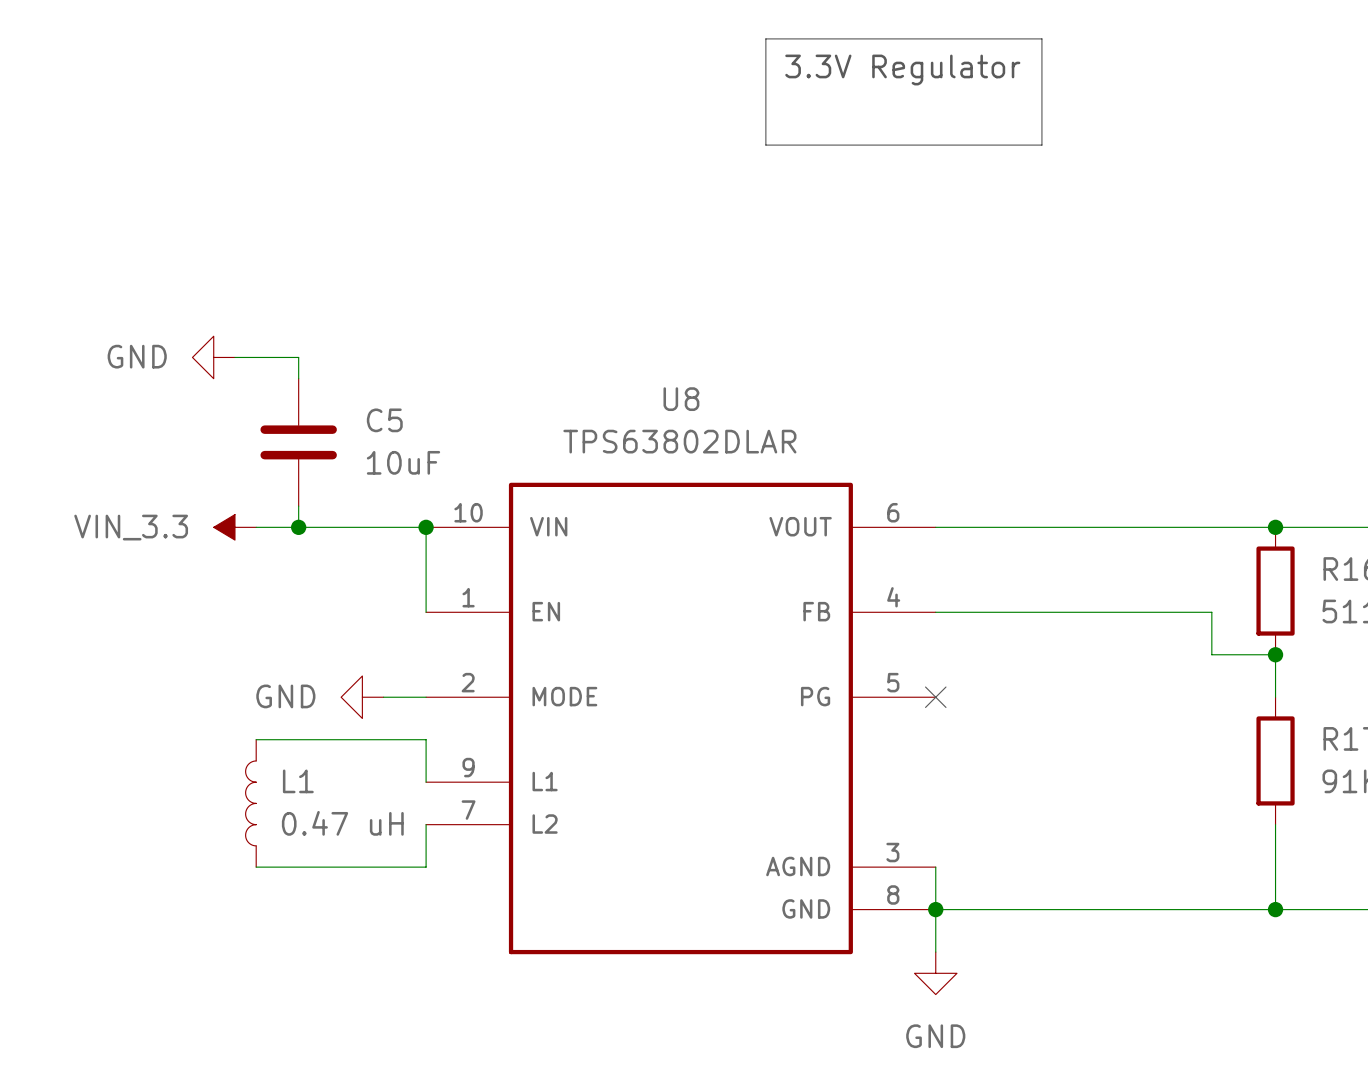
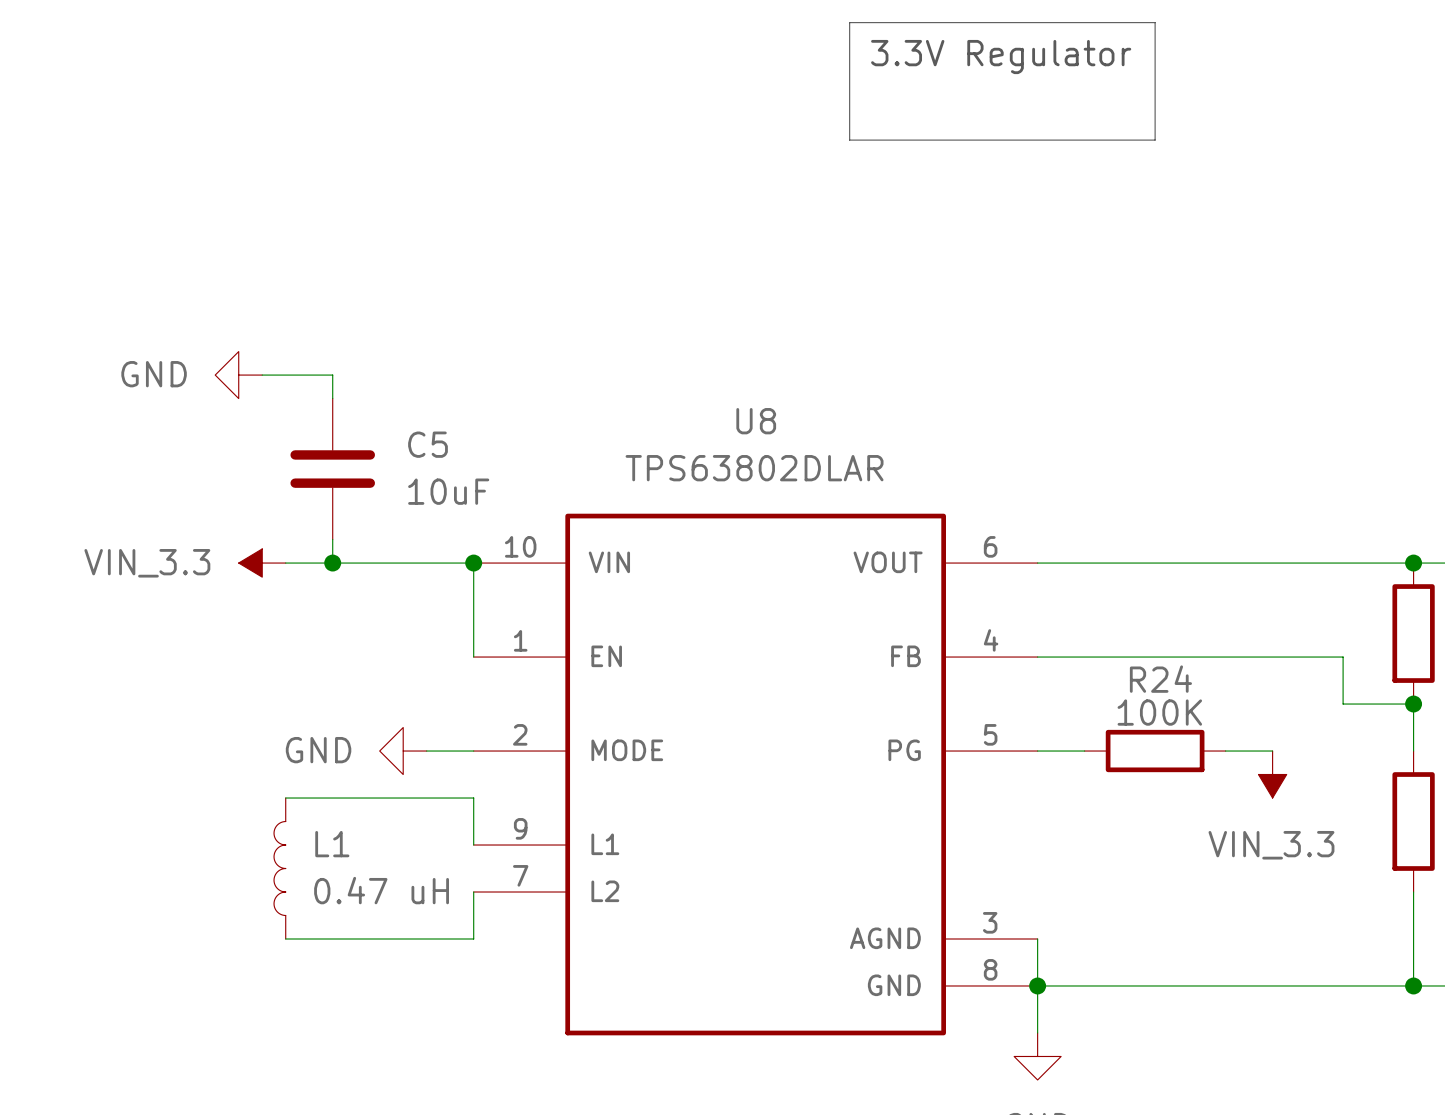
wire: none -> (1037, 751) (1084, 751)
no-connect mark: (935, 697) -> none
R24: none -> 100K (1155, 751)
wire: none -> (1225, 751) (1272, 751)
power symbol: none -> VIN_3.3 (1272, 774)

